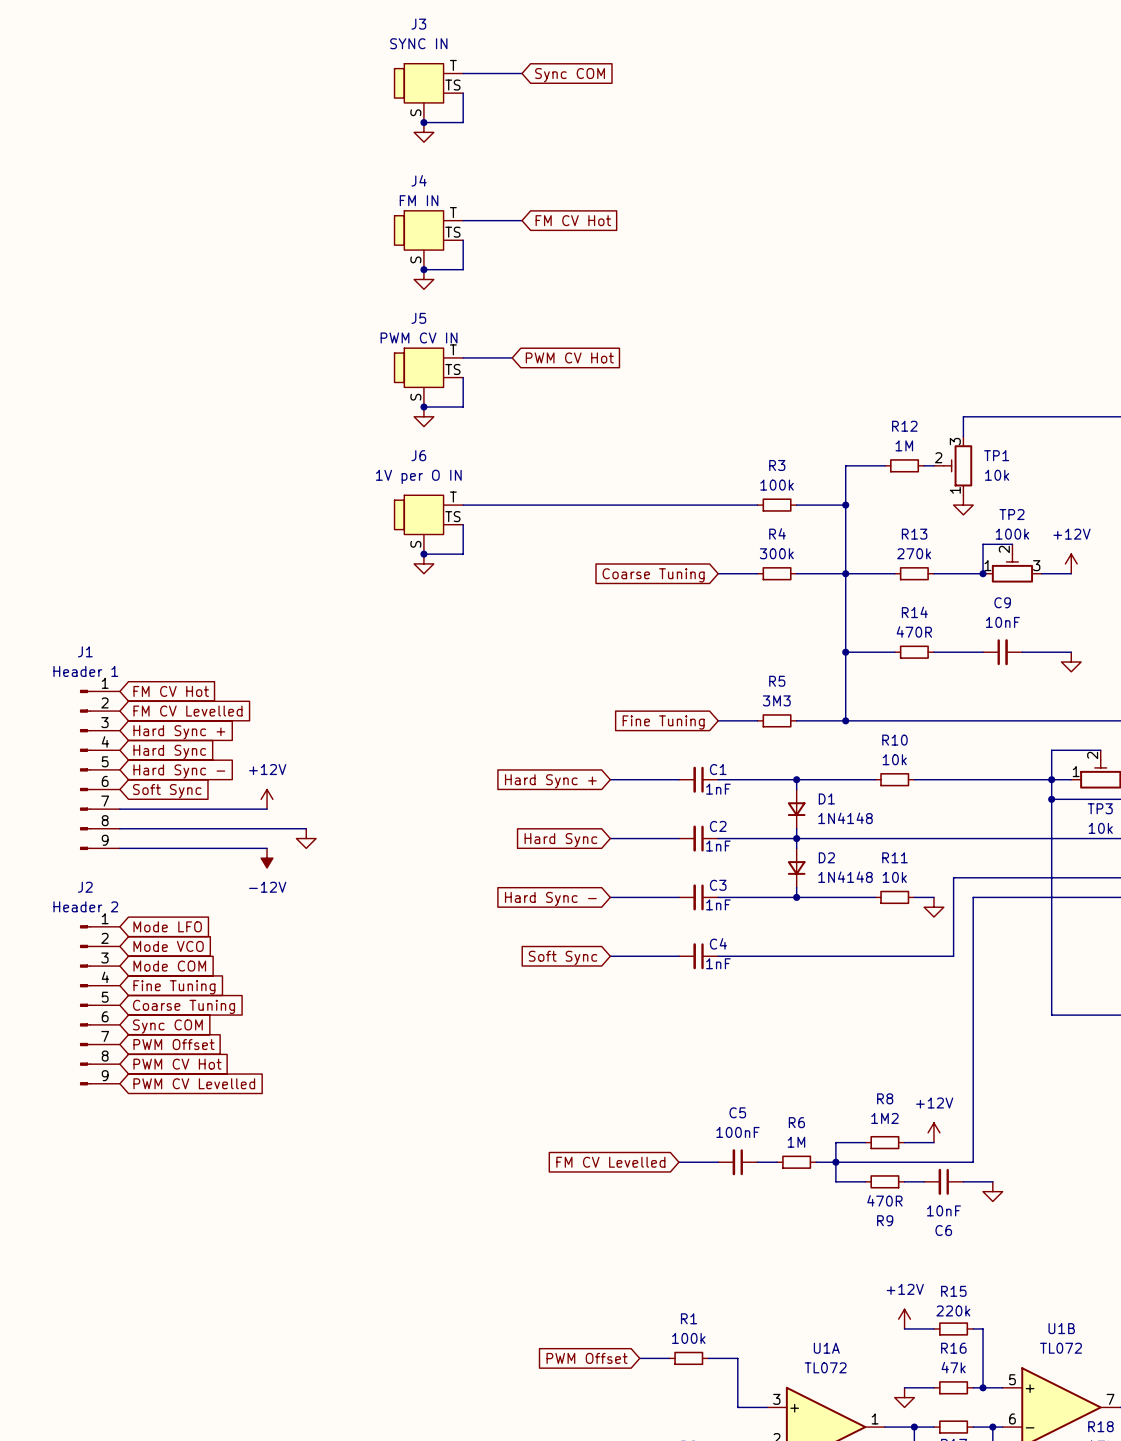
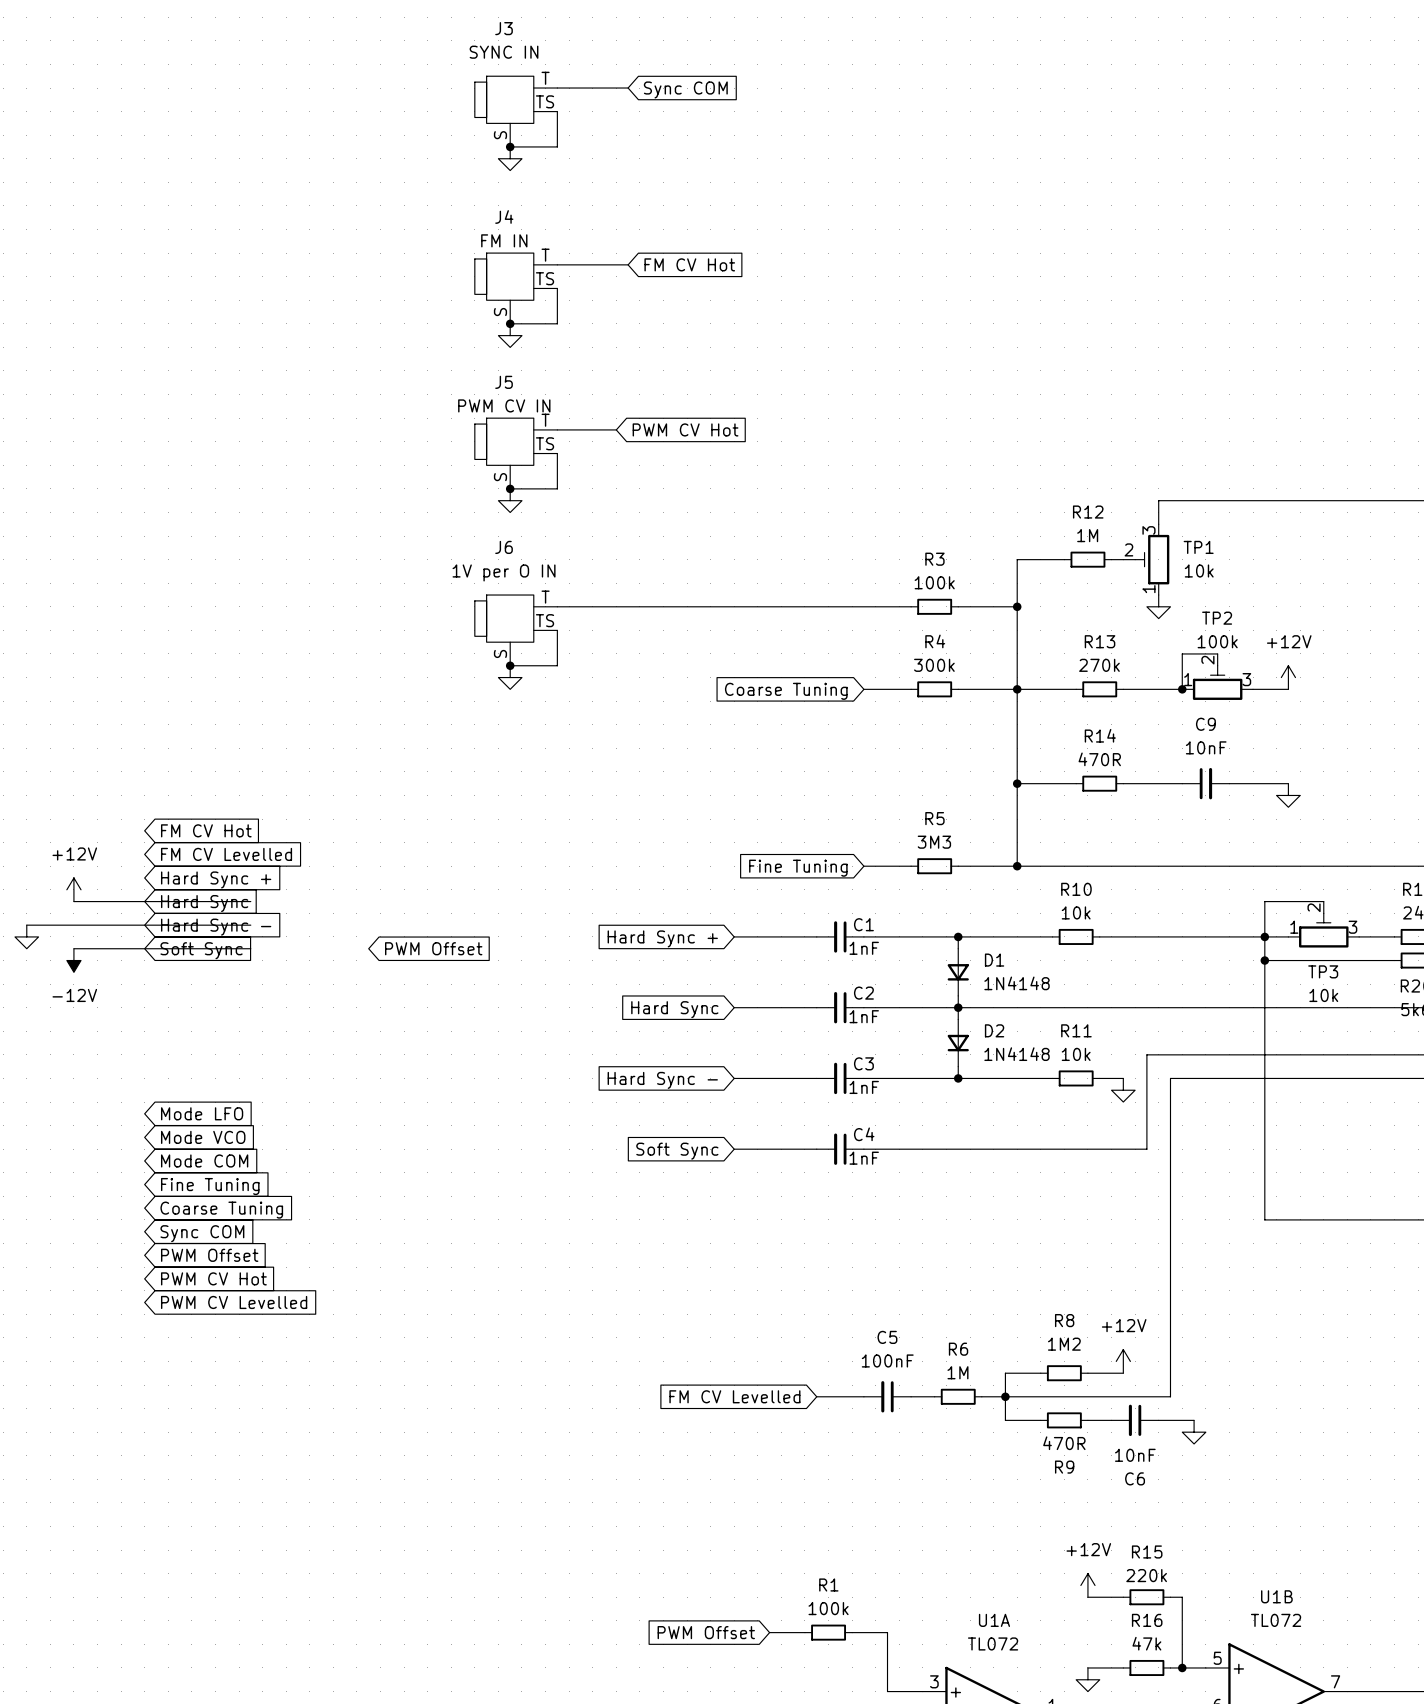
power symbol: none -> +12V (73, 889)
J1: Header 1 (99, 769) -> none
power symbol: none -> (26, 936)
global label: none -> PWM Offset (433, 948)
power symbol: none -> -12V (73, 960)
power symbol: +12V (267, 799) -> none
wire: (119, 809) (267, 809) -> (73, 901) (250, 901)
wire: (119, 828) (306, 828) -> (26, 925) (250, 925)
power symbol: (306, 838) -> none
wire: (119, 848) (267, 848) -> (73, 948) (250, 948)
power symbol: -12V (267, 858) -> none
J2: Header 2 (99, 1005) -> none

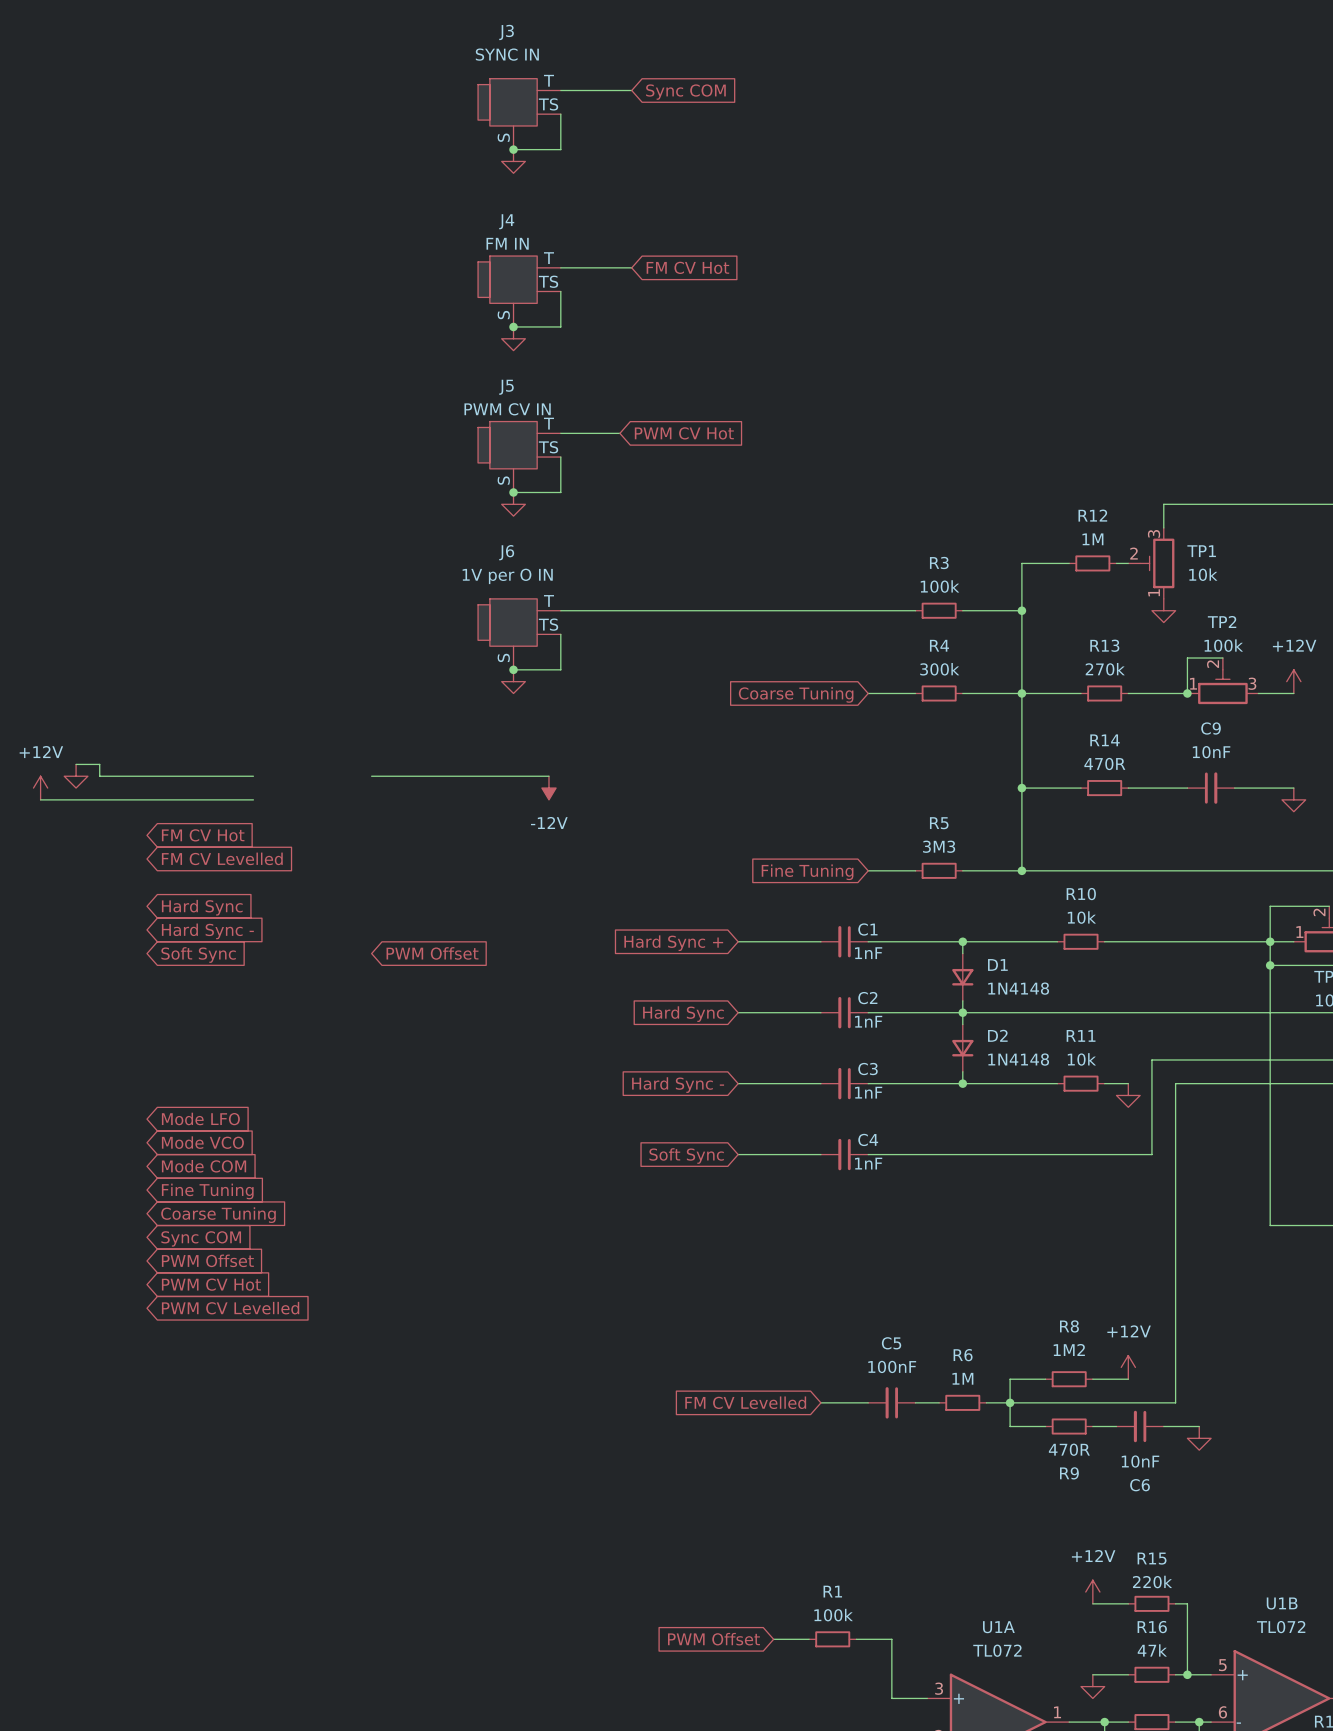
wire: none -> (76, 764) (99, 764) (99, 776) (253, 776)
wire: none -> (371, 776) (548, 776)
power symbol: none -> -12V (548, 788)
wire: none -> (40, 799) (253, 799)
global label: Hard Sync + (216, 879) -> none
power symbol position: +12V (73, 889) -> +12V (40, 788)
wire: (73, 901) (250, 901) -> none
wire: (26, 925) (250, 925) -> none
power symbol position: (26, 936) -> (76, 776)
wire: (73, 948) (250, 948) -> none
power symbol: -12V (73, 960) -> none

